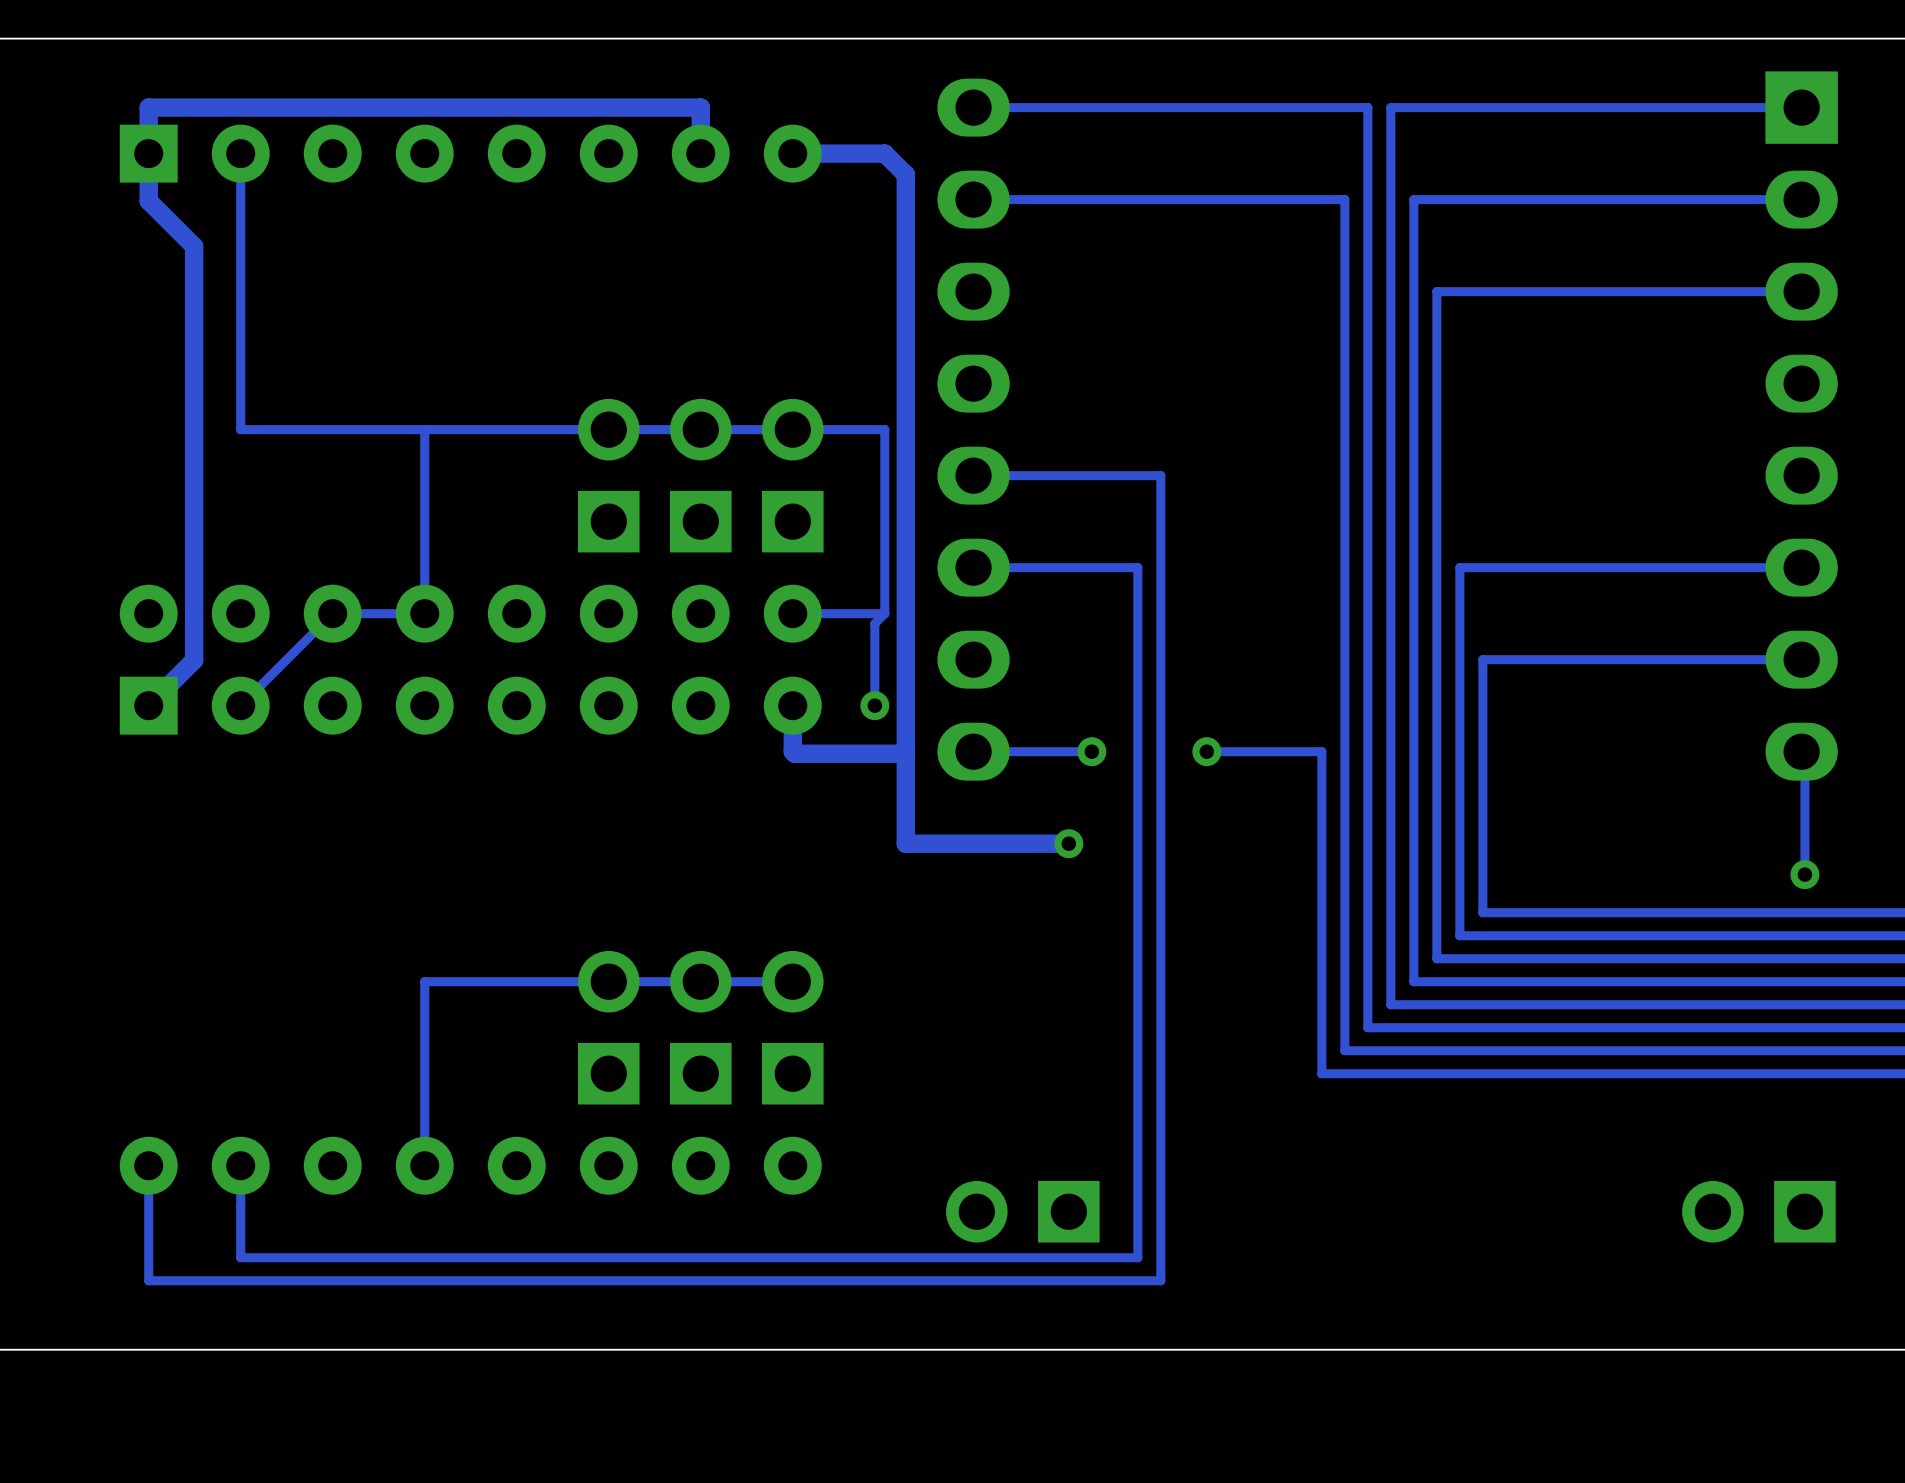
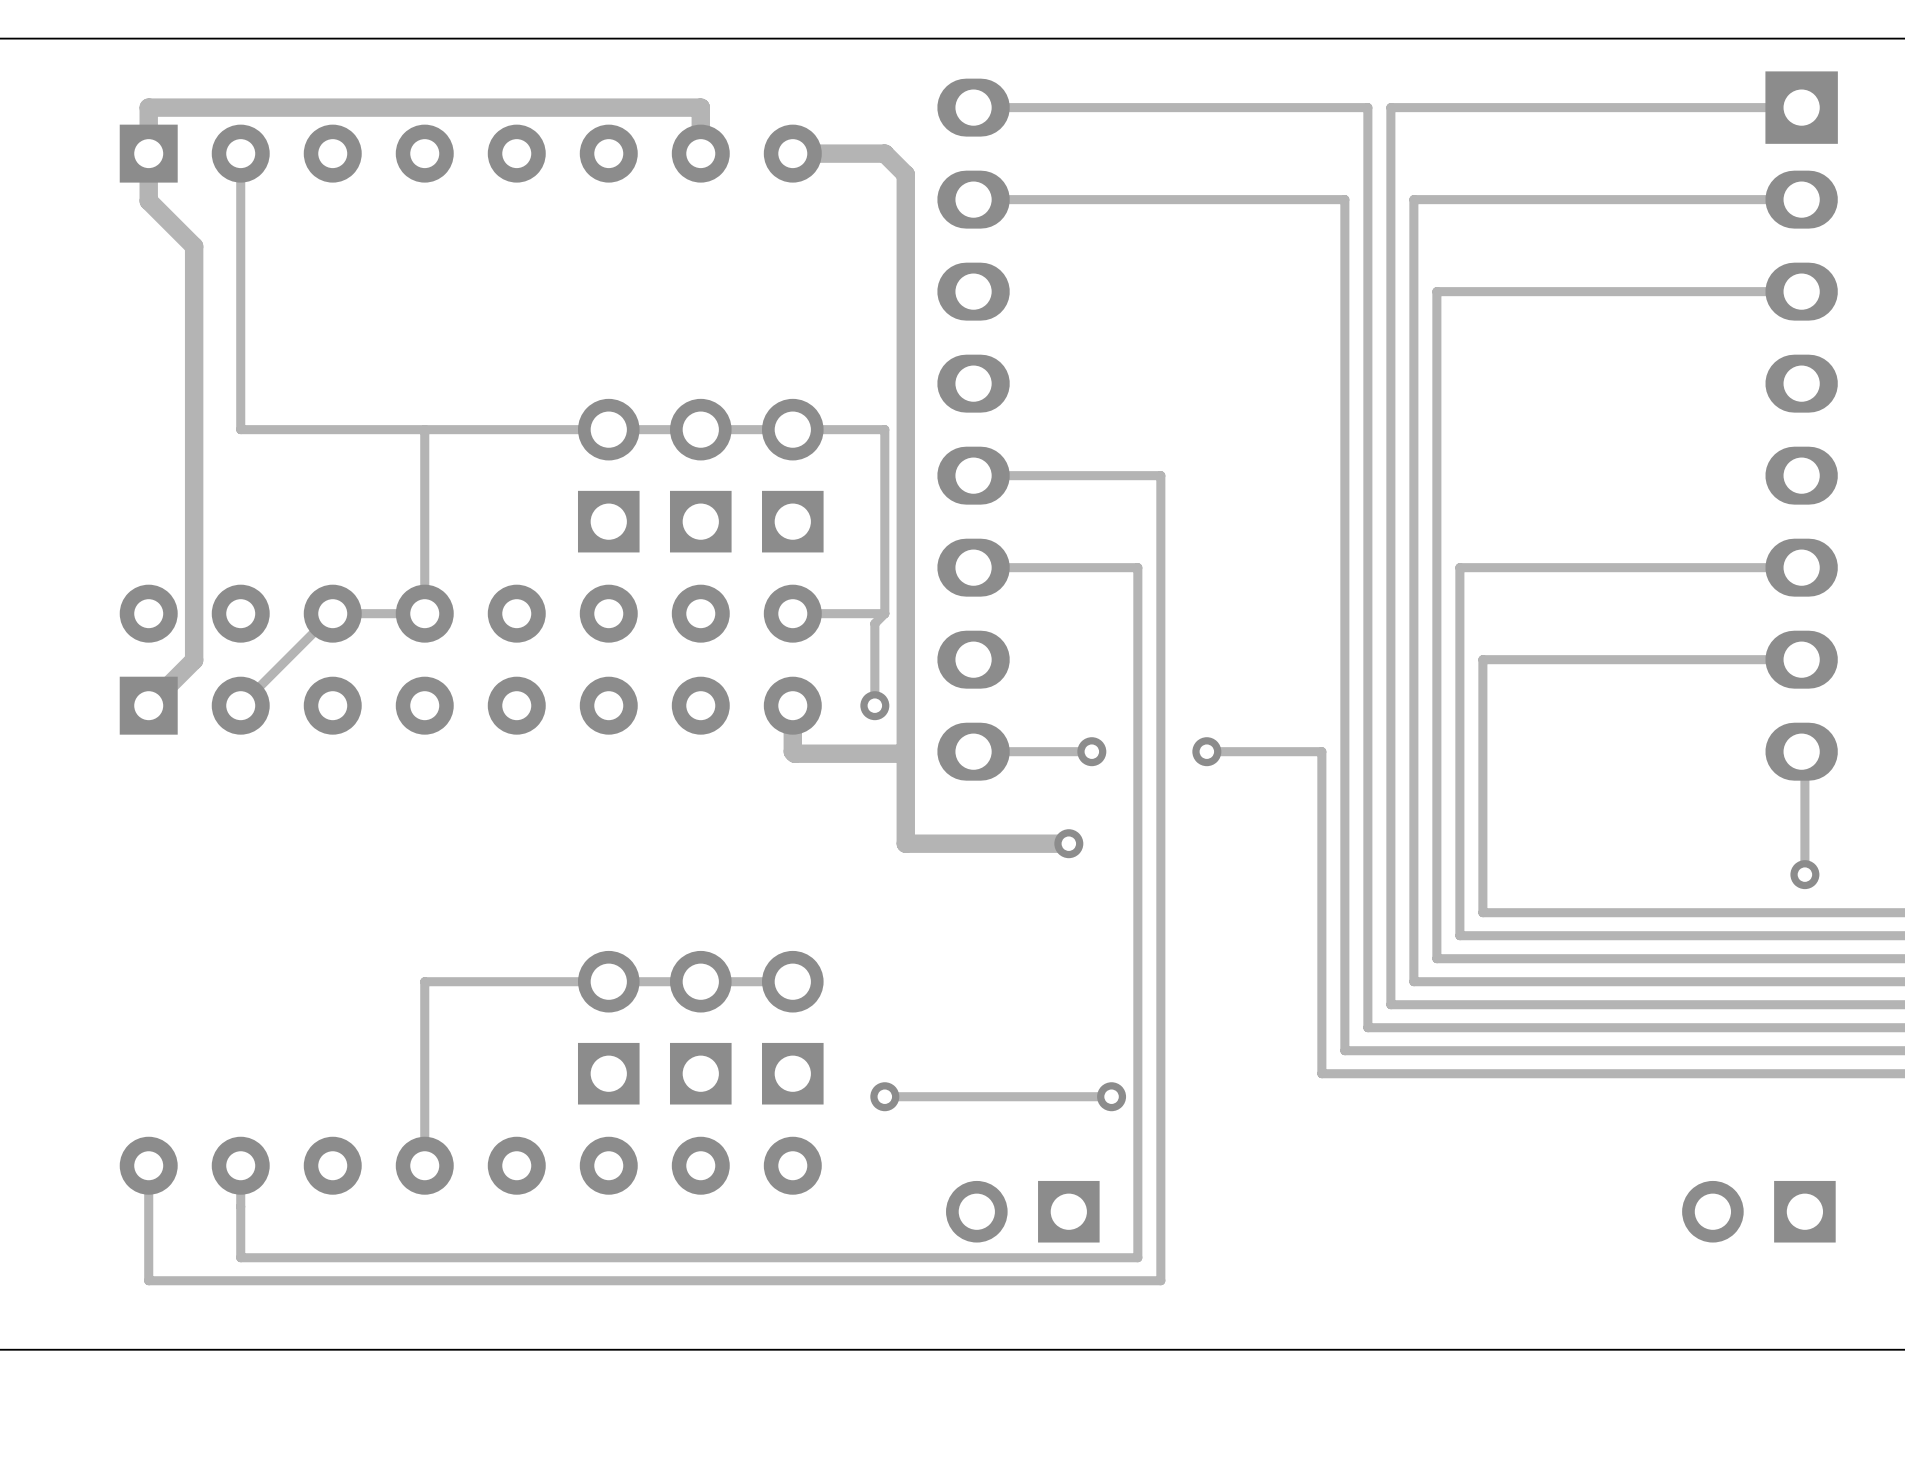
via: none -> (884, 1096)
track: none -> (1111, 1096) (884, 1096)
via: none -> (1111, 1096)

